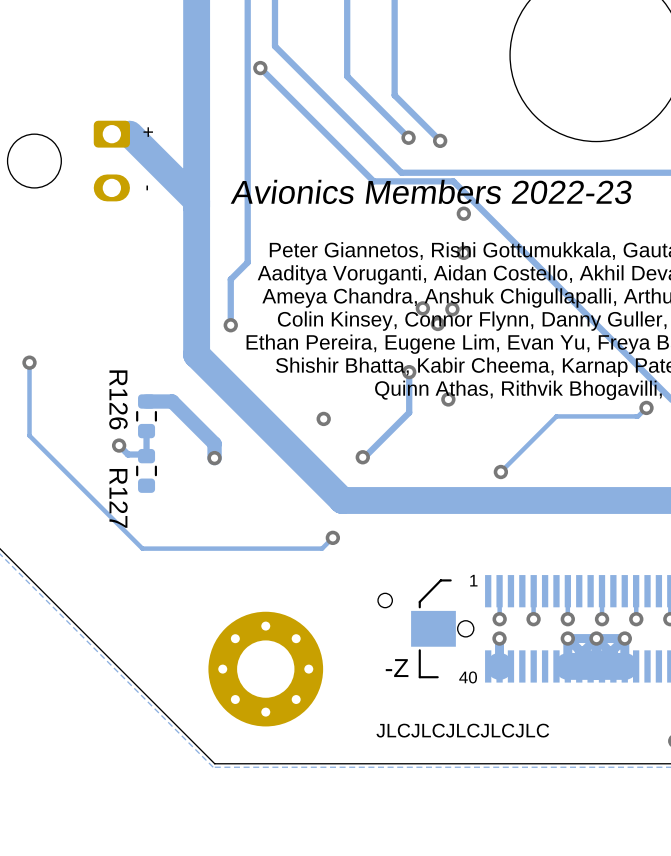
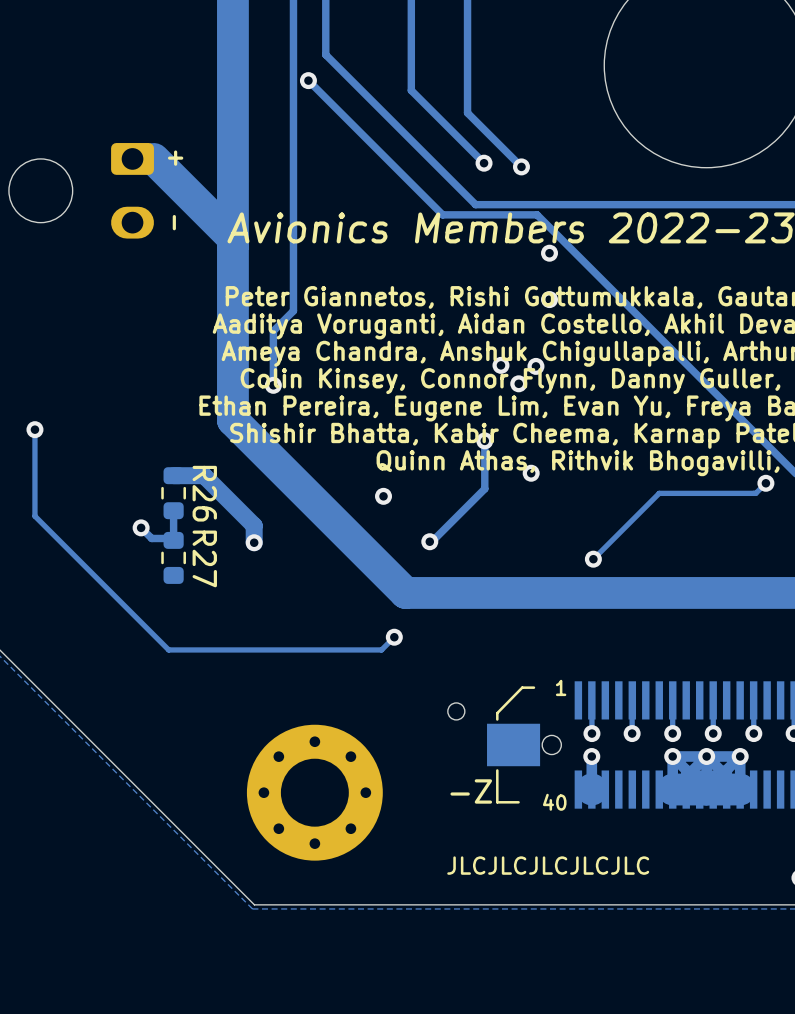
R126 name: R126 (118, 399) -> R26 (204, 493)
R127 name: R127 (118, 498) -> R27 (204, 558)

